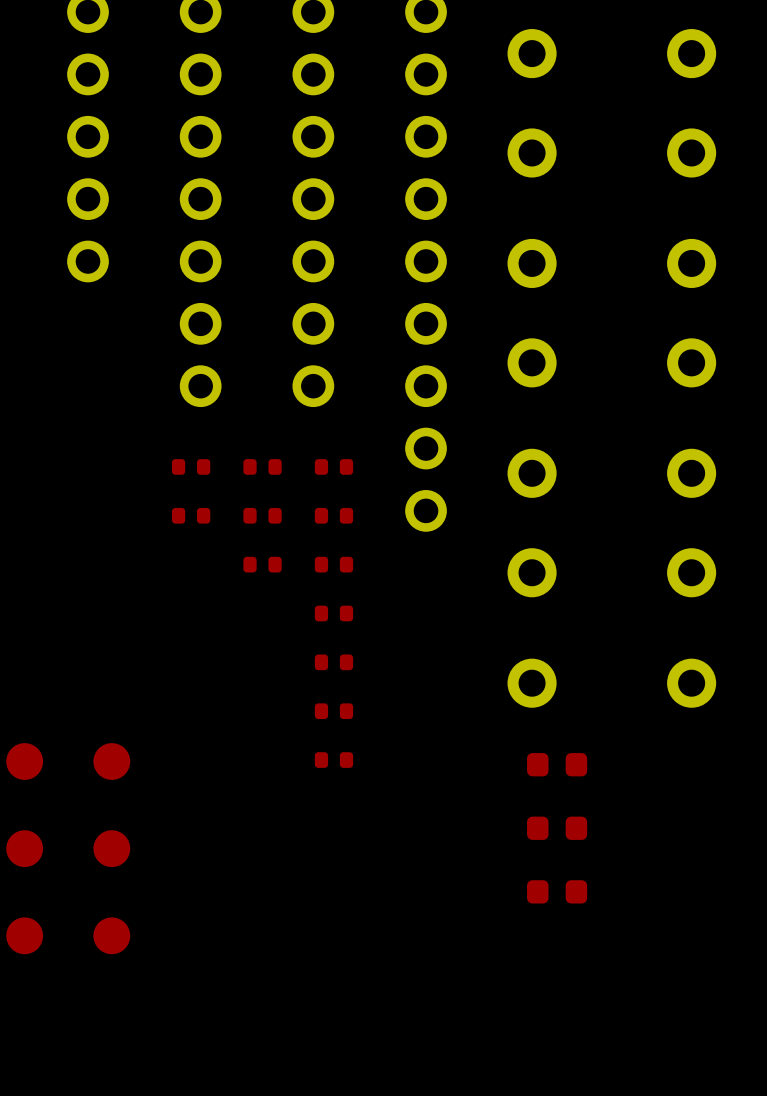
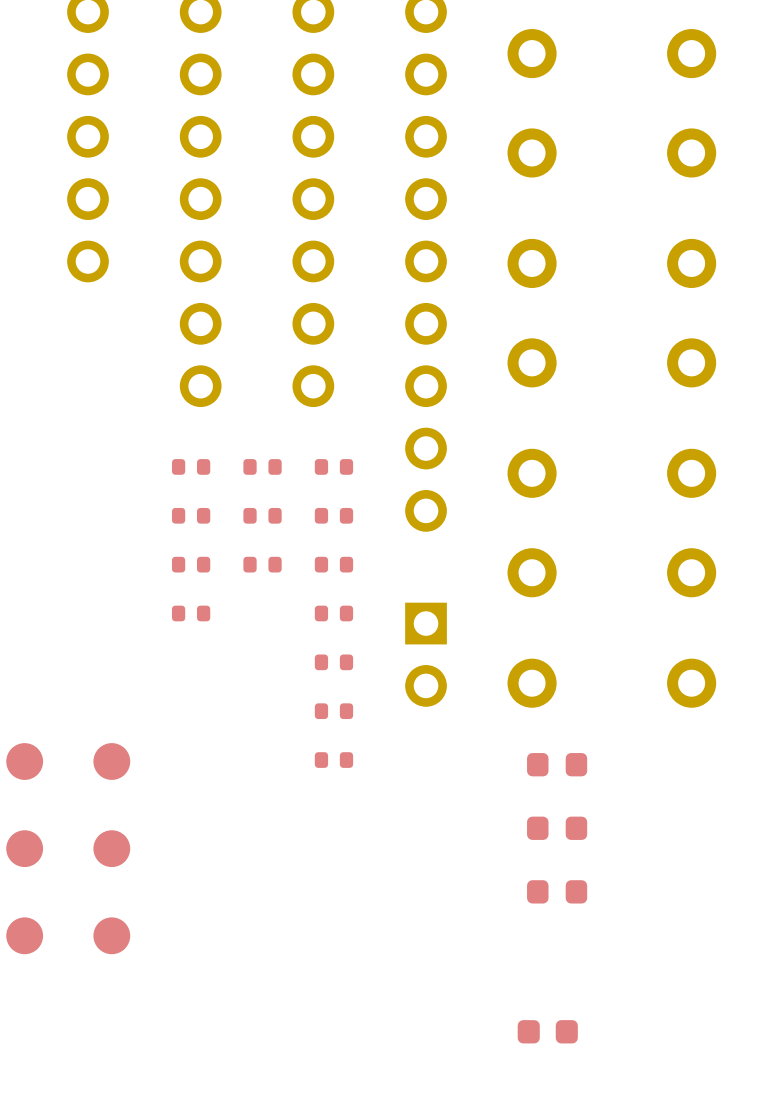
part: none -> (191, 564)
part: none -> (191, 613)
part: none -> (426, 654)
part: none -> (547, 1031)

